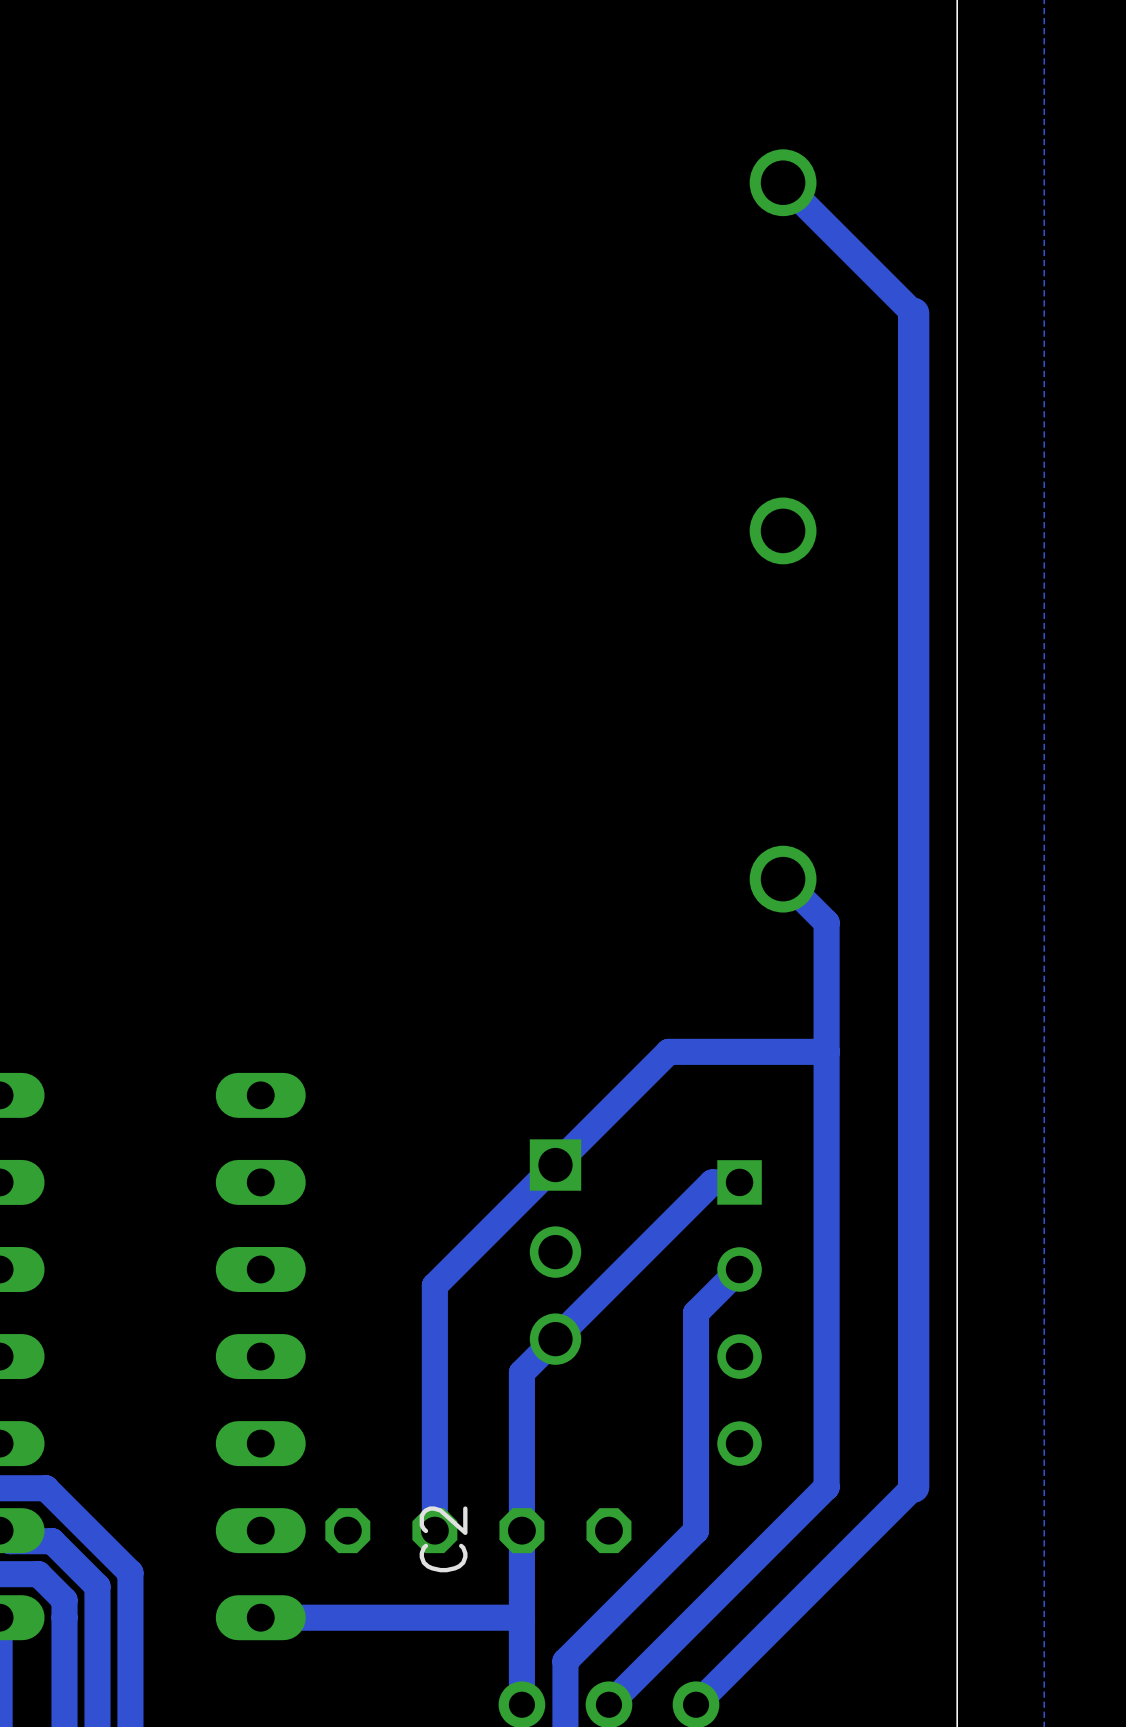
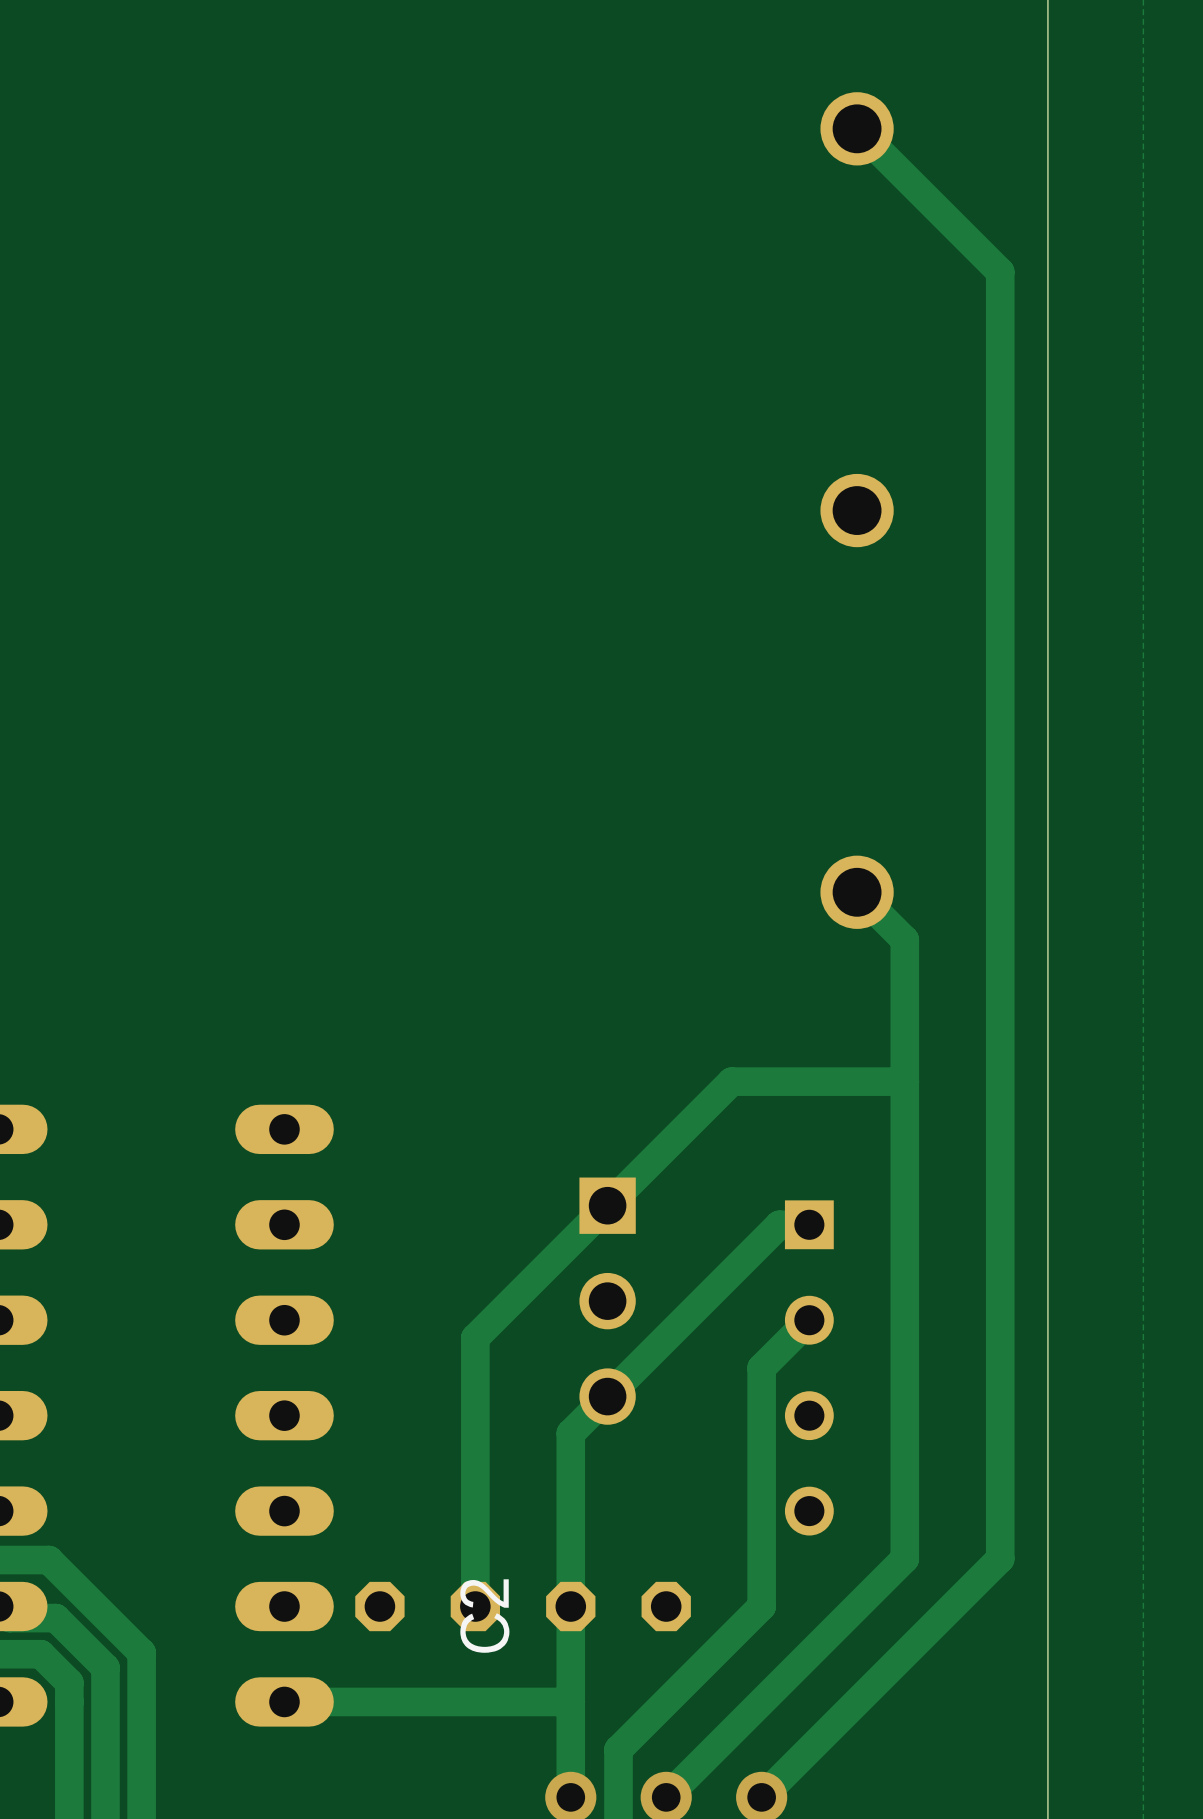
track width: thick (913, 313) (913, 1487) -> thin (1000, 271) (1000, 1558)

